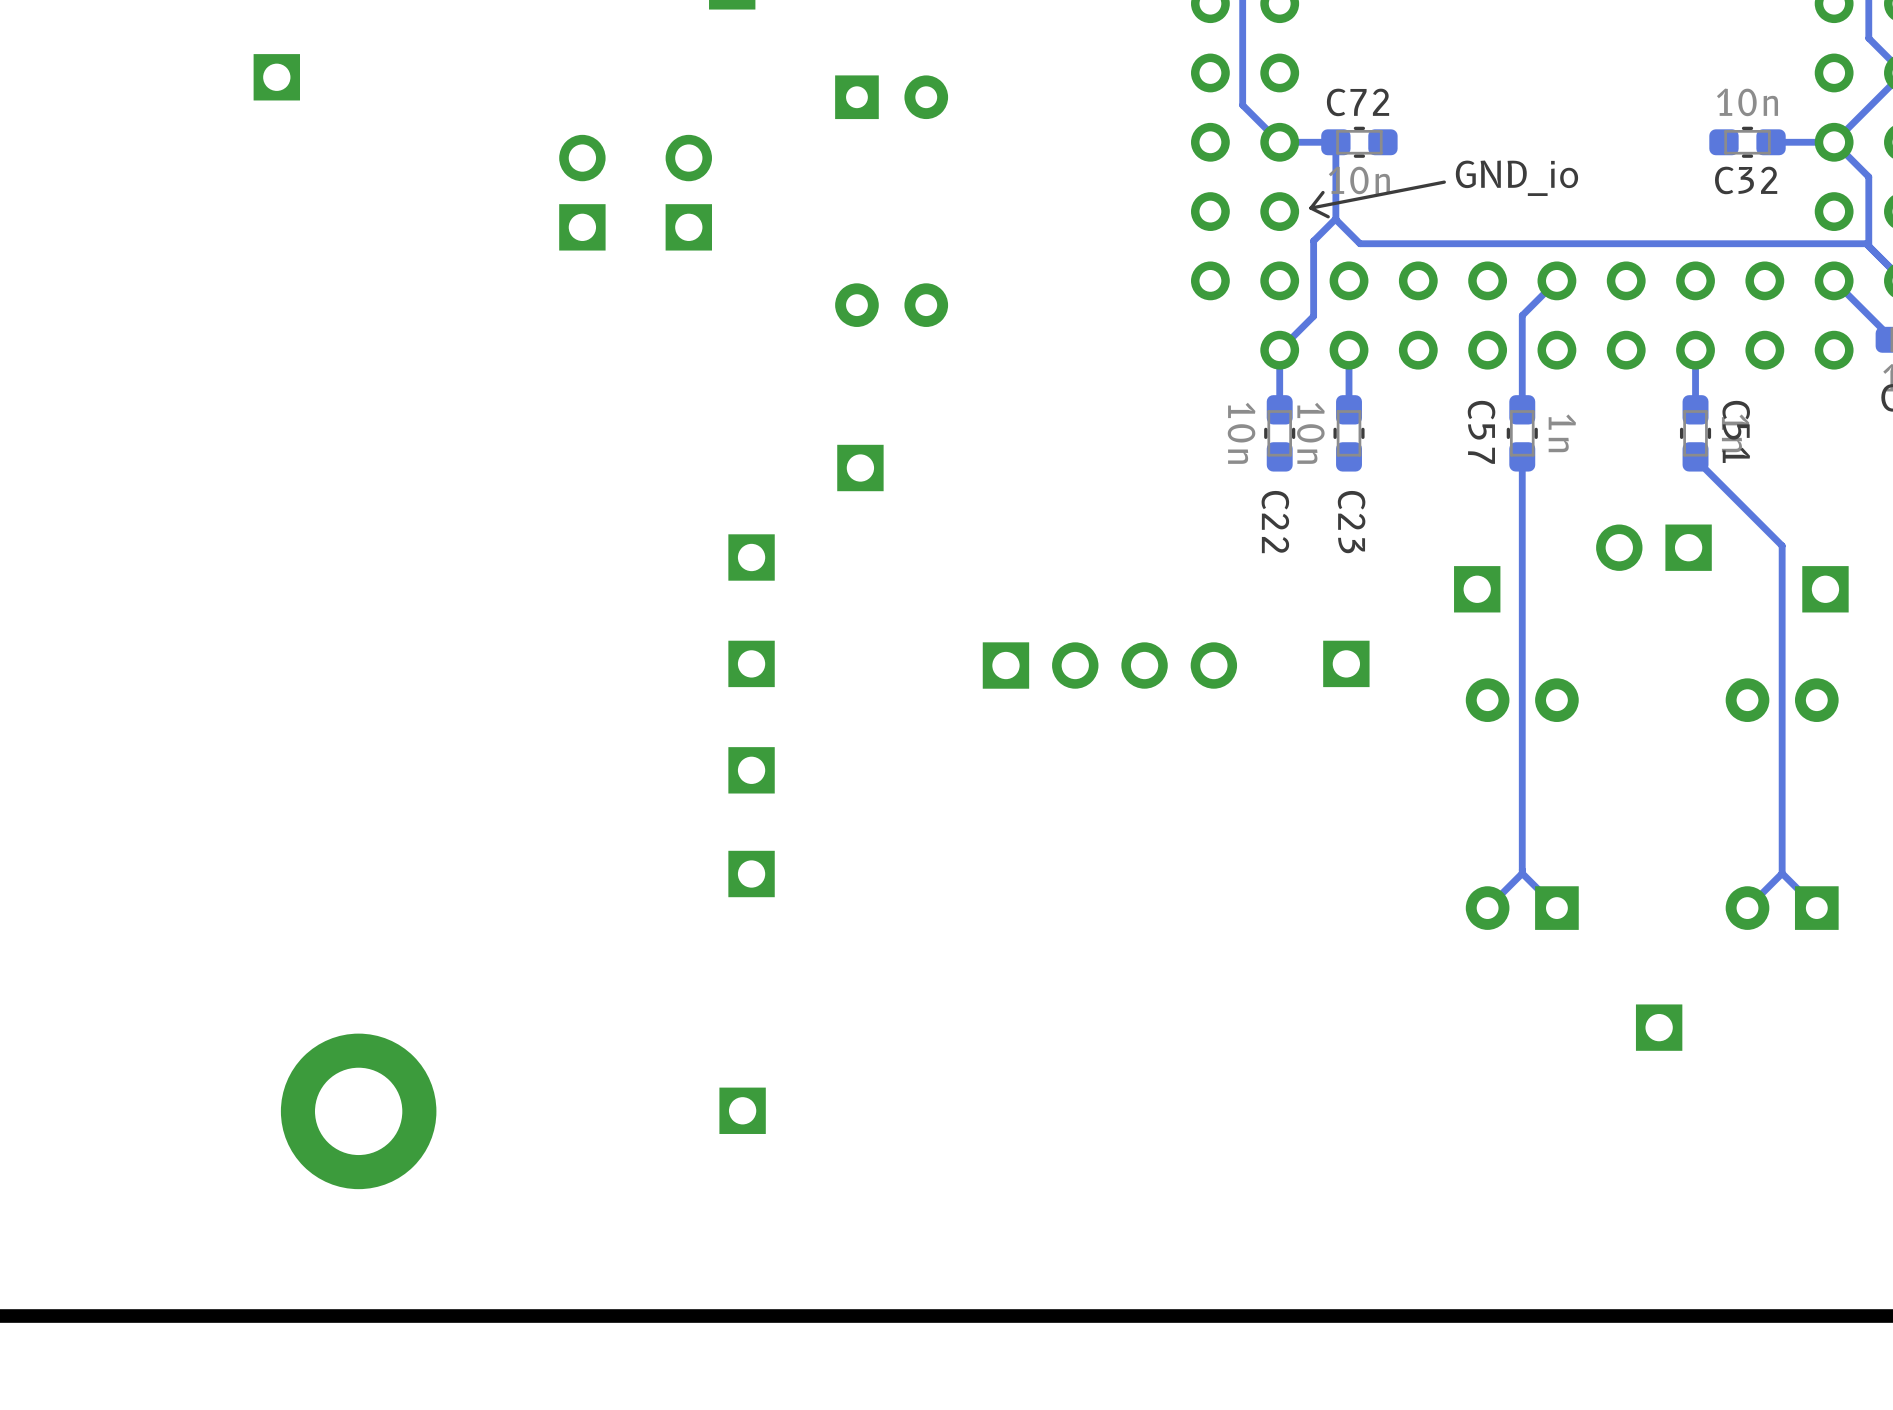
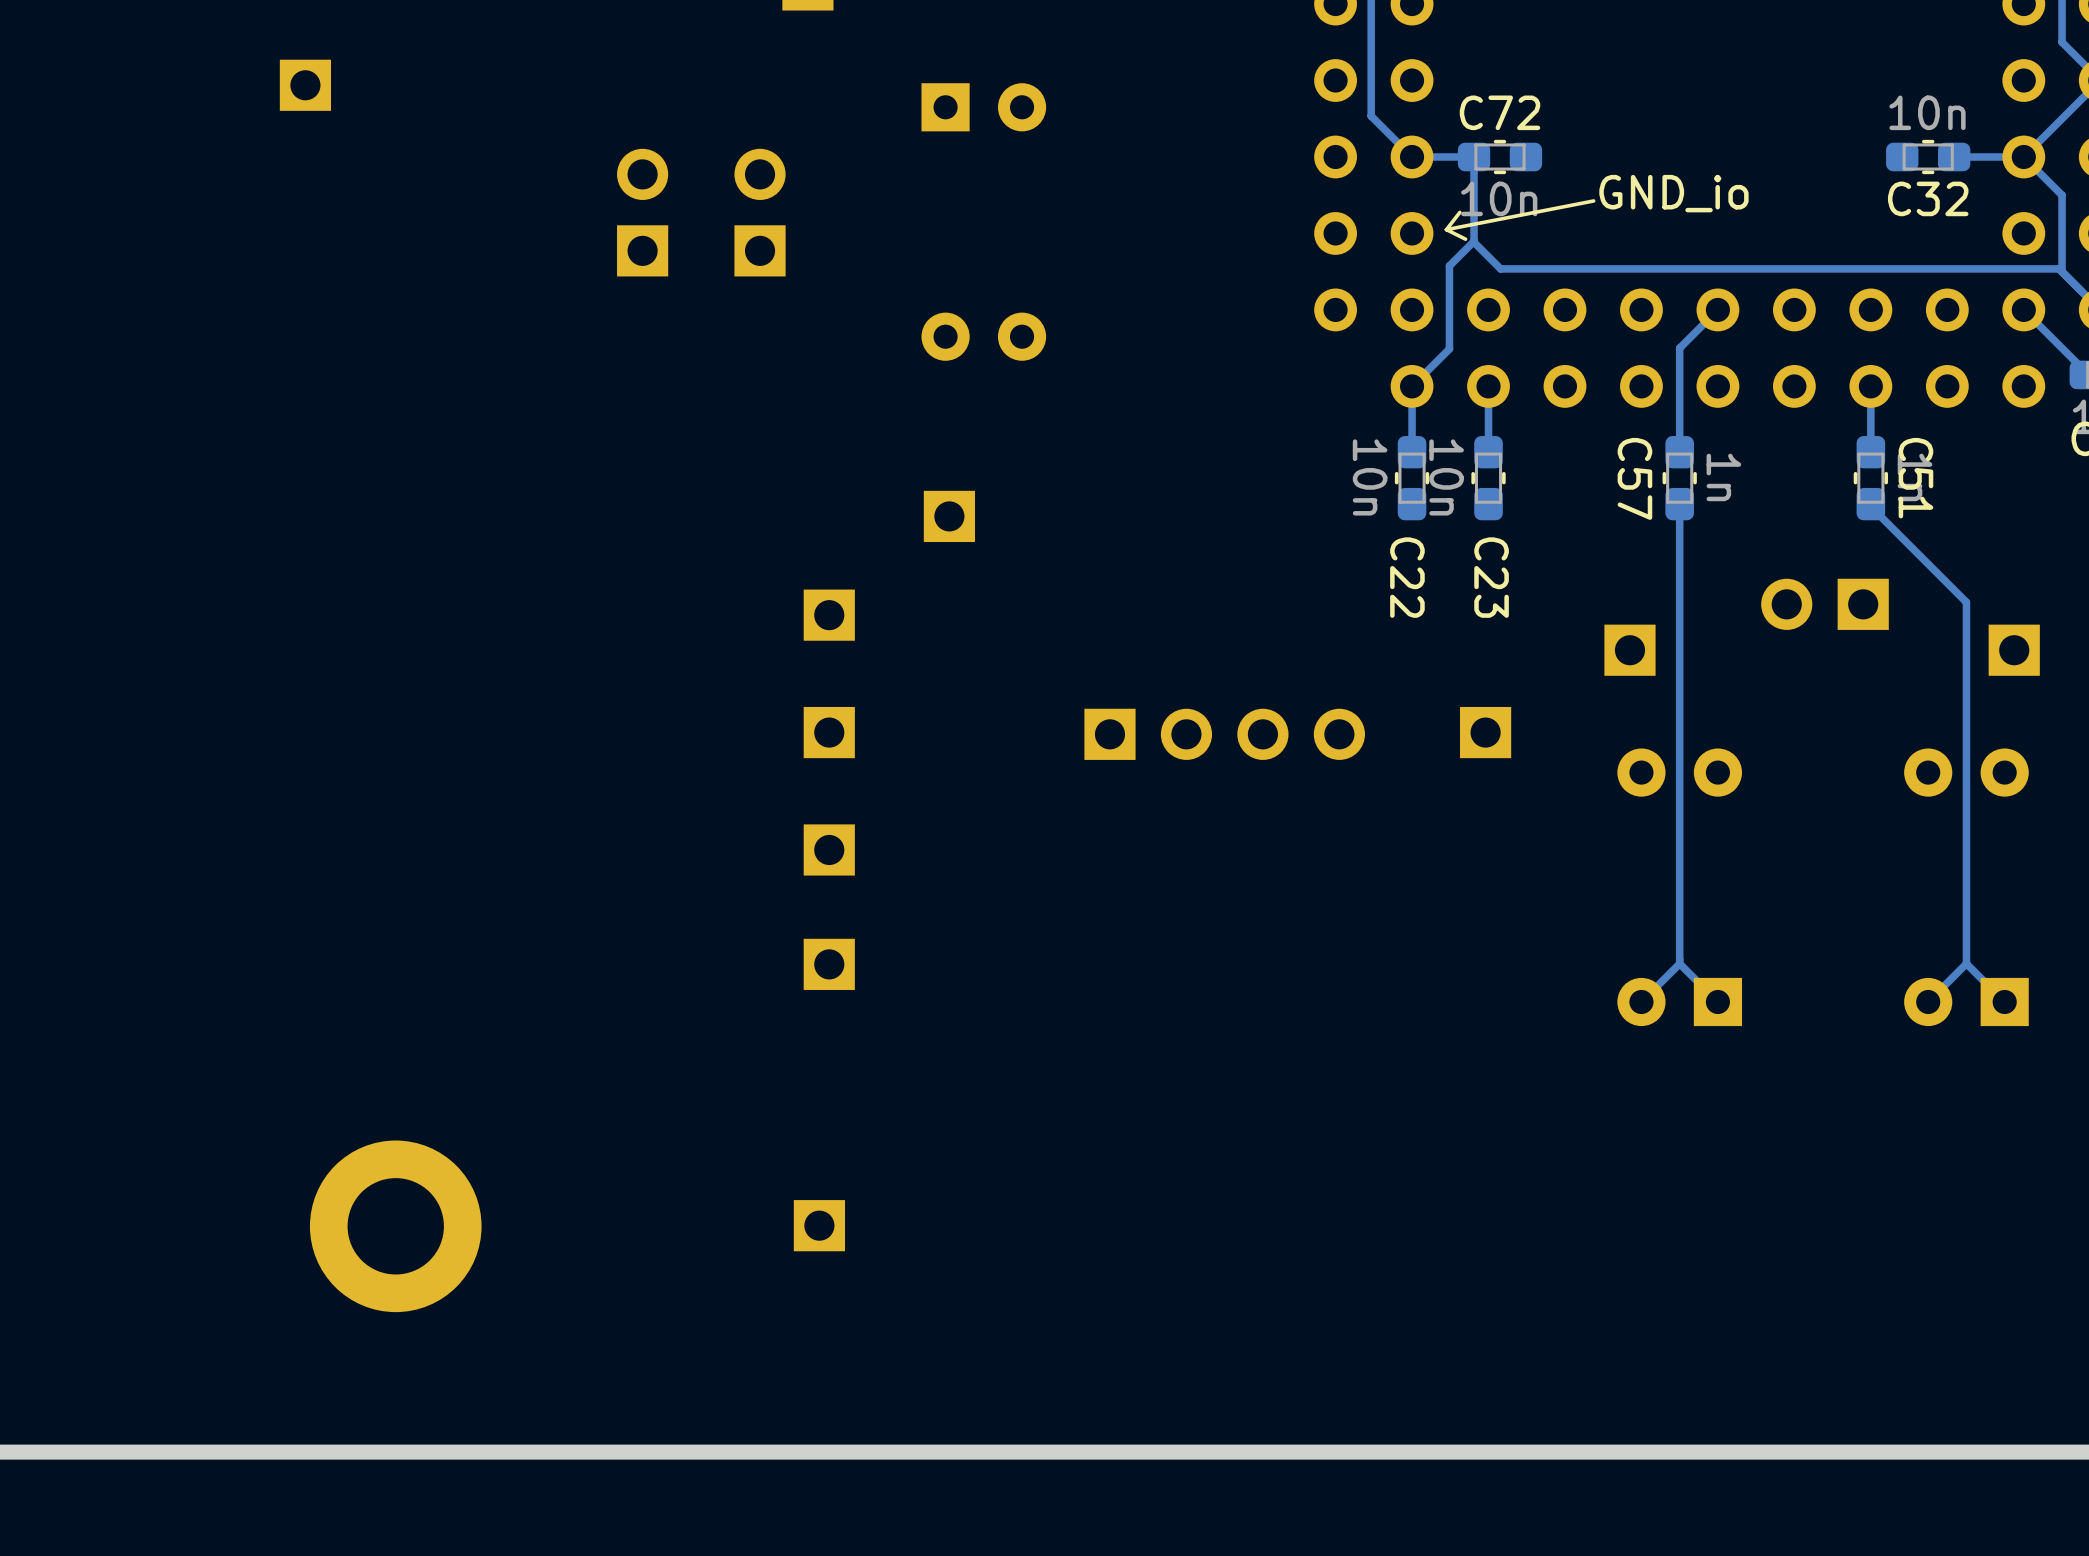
part: (1659, 1027) -> none

